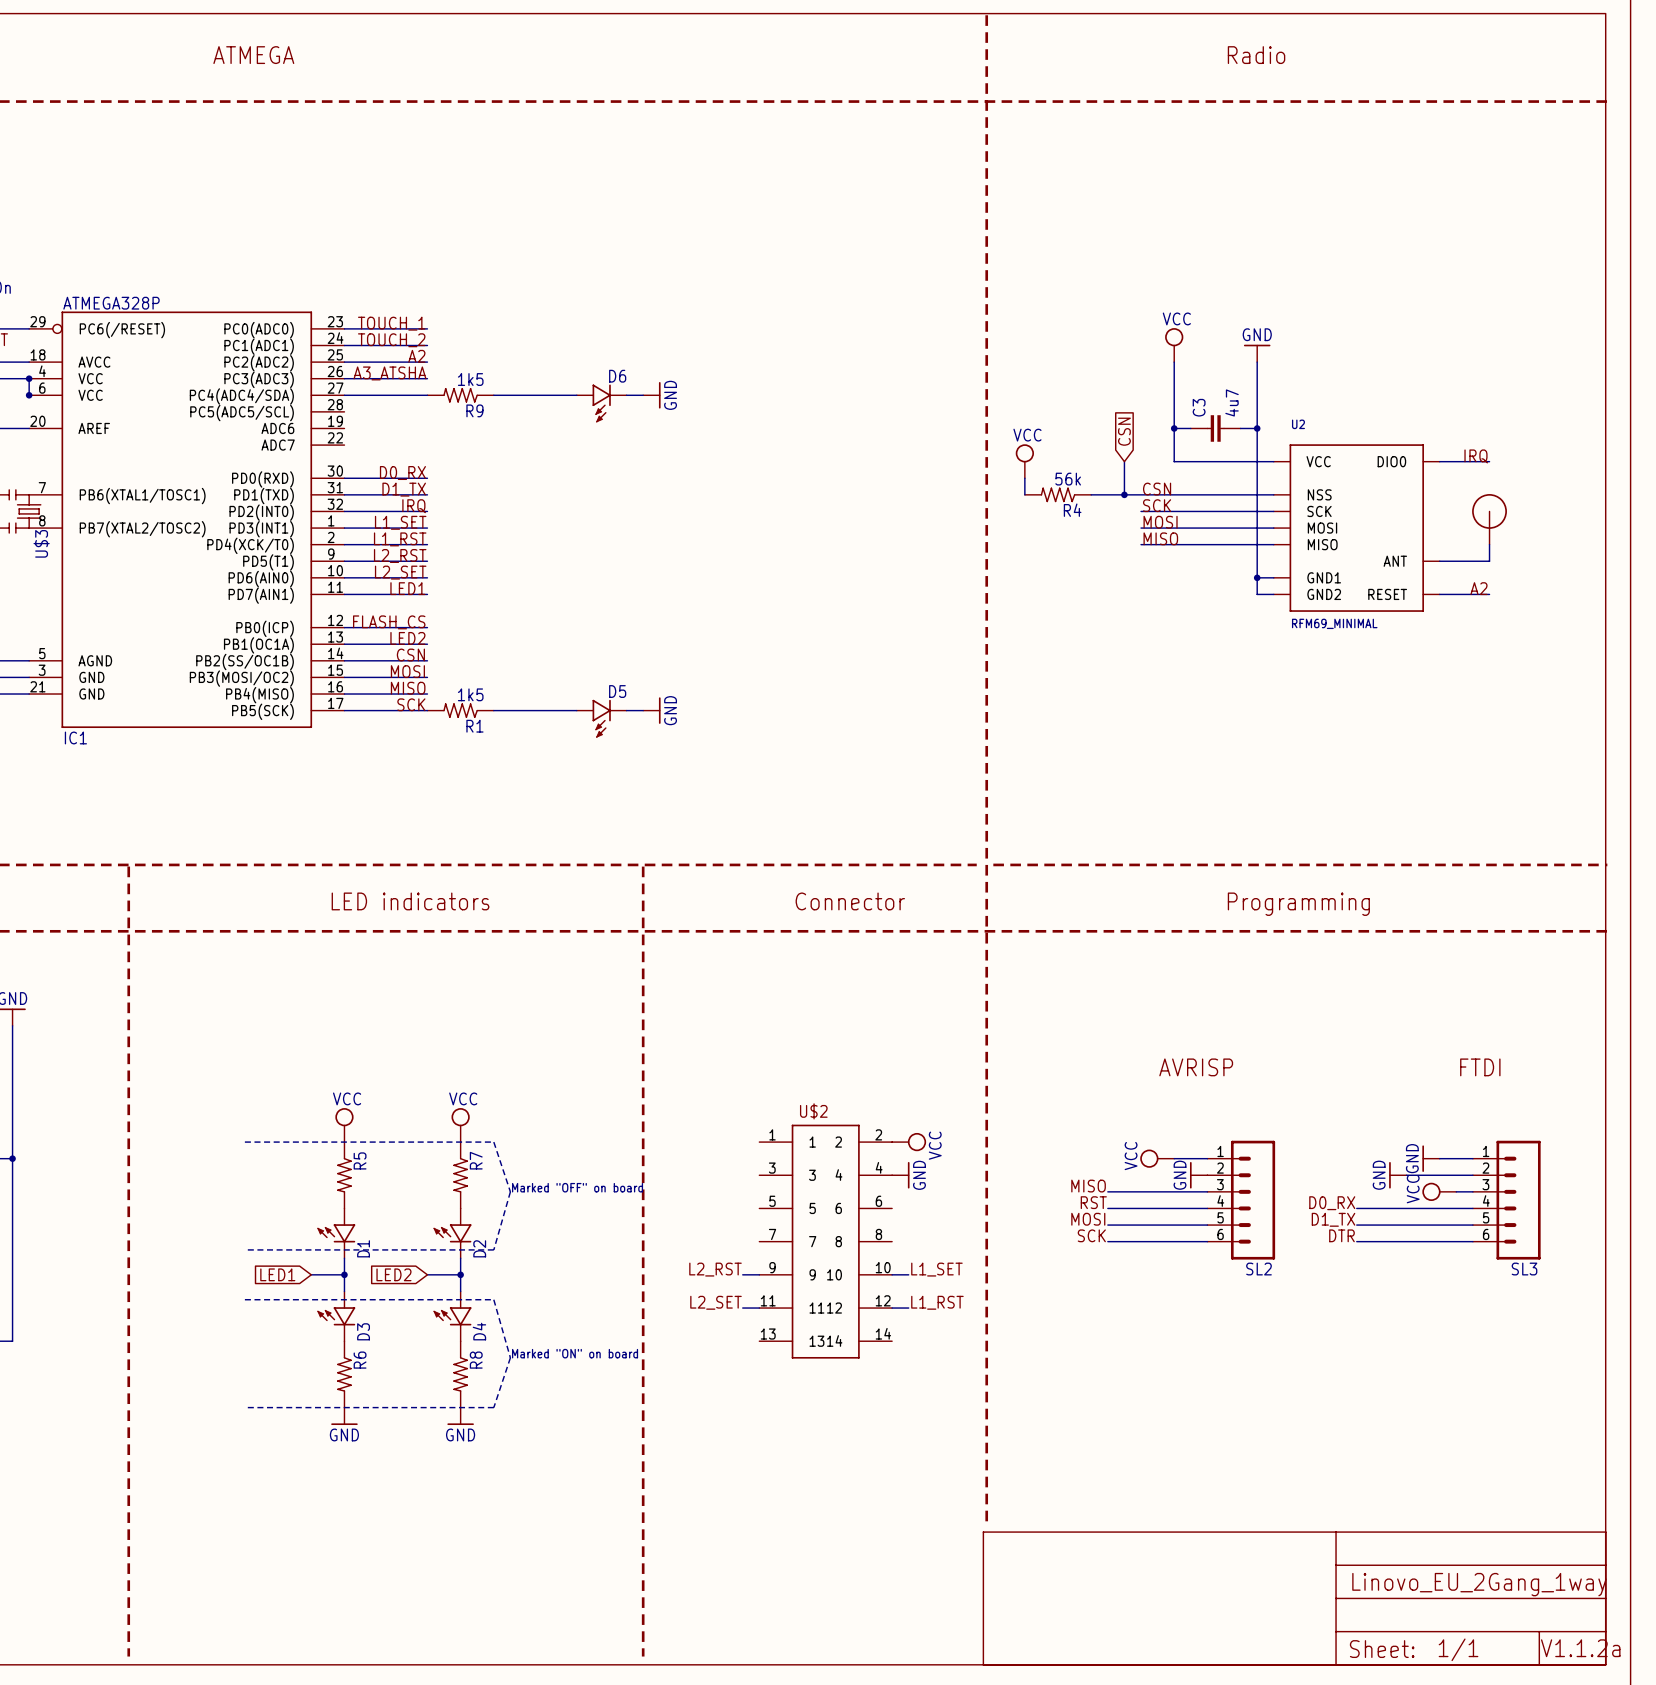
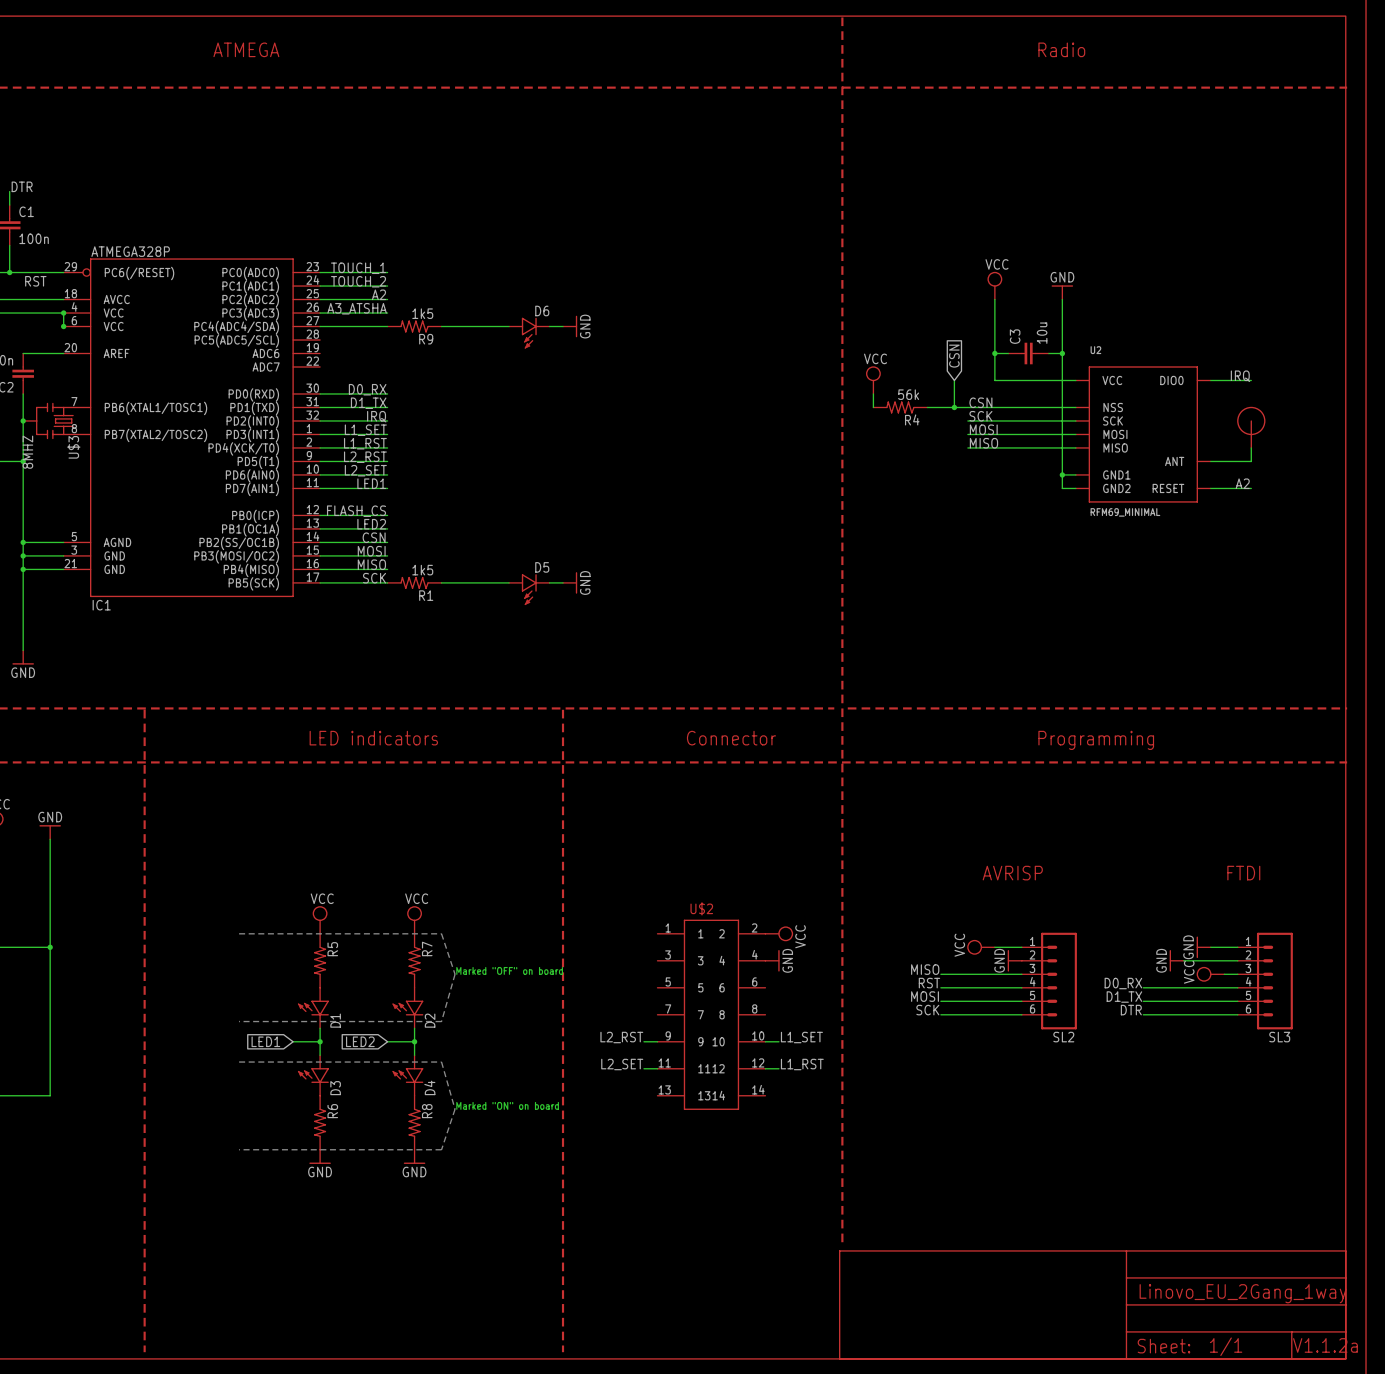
C3 value: 4u7 (1232, 402) -> 10u (1042, 333)

